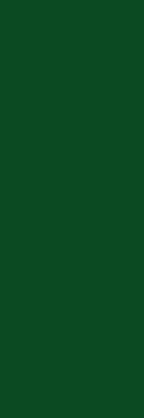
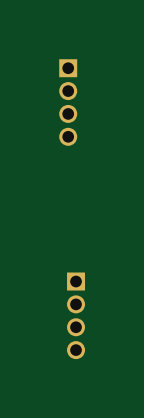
part: none -> (68, 102)
part: none -> (76, 315)

